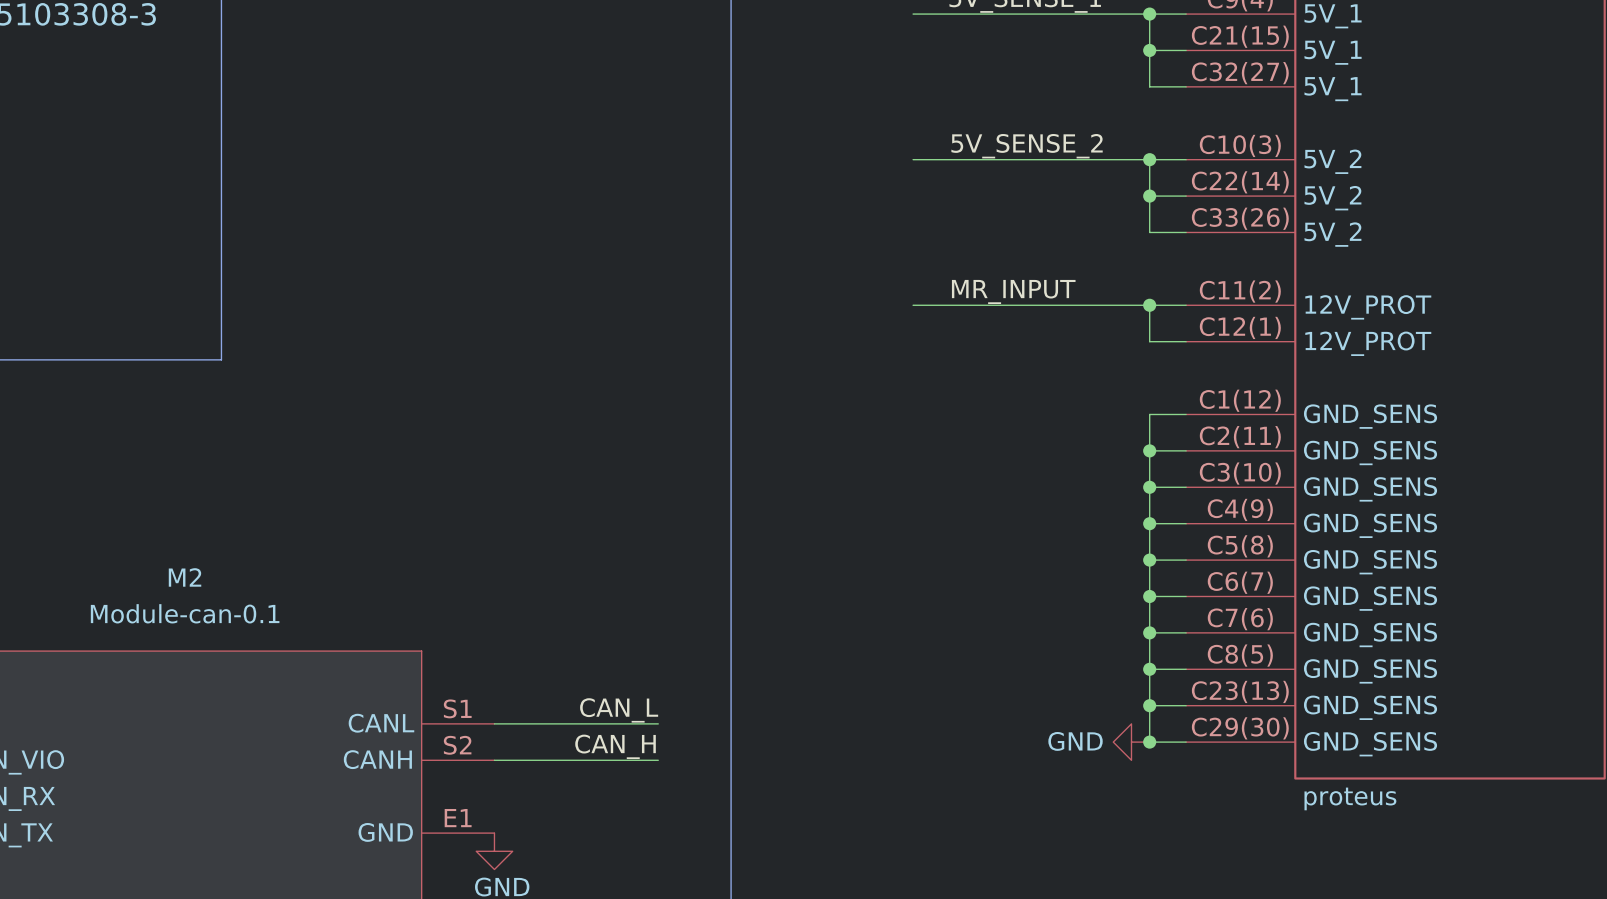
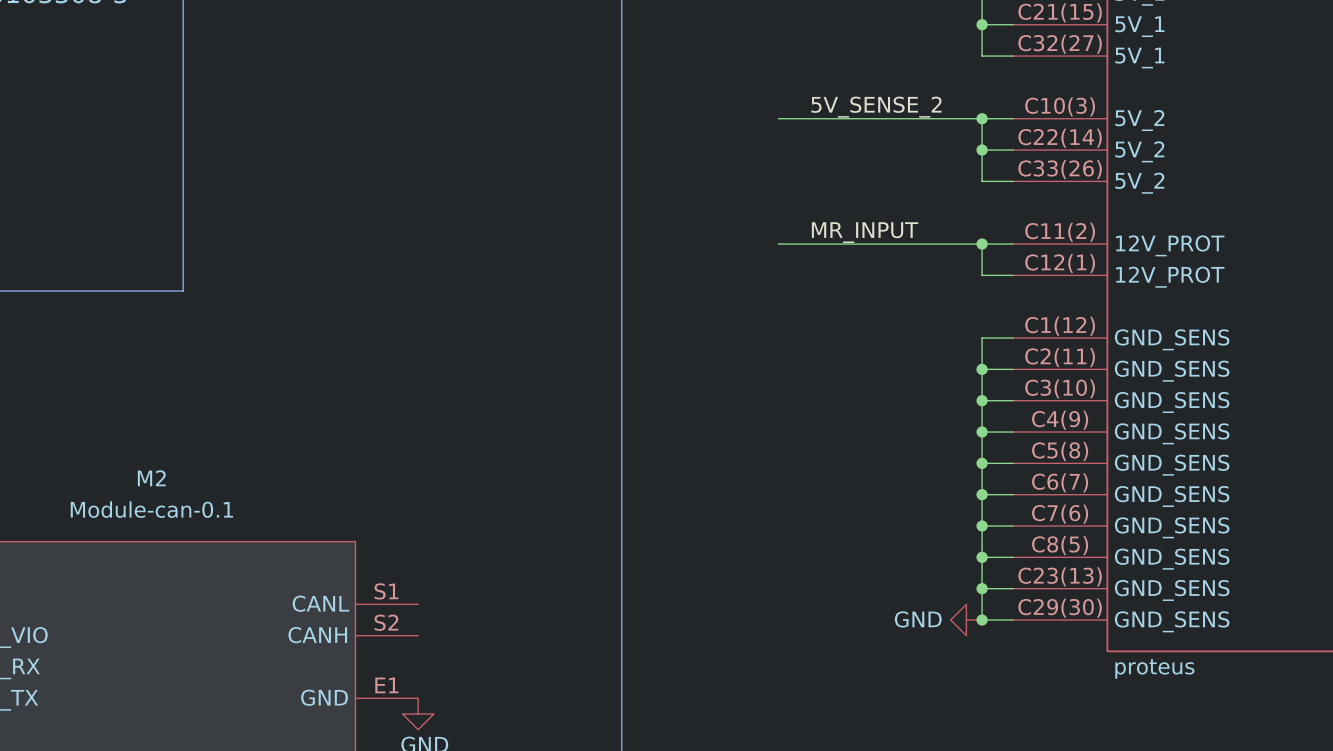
label: CAN_L (619, 710) -> none
wire: (494, 723) (658, 723) -> none
label: CAN_H (615, 746) -> none
wire: (494, 760) (658, 760) -> none

